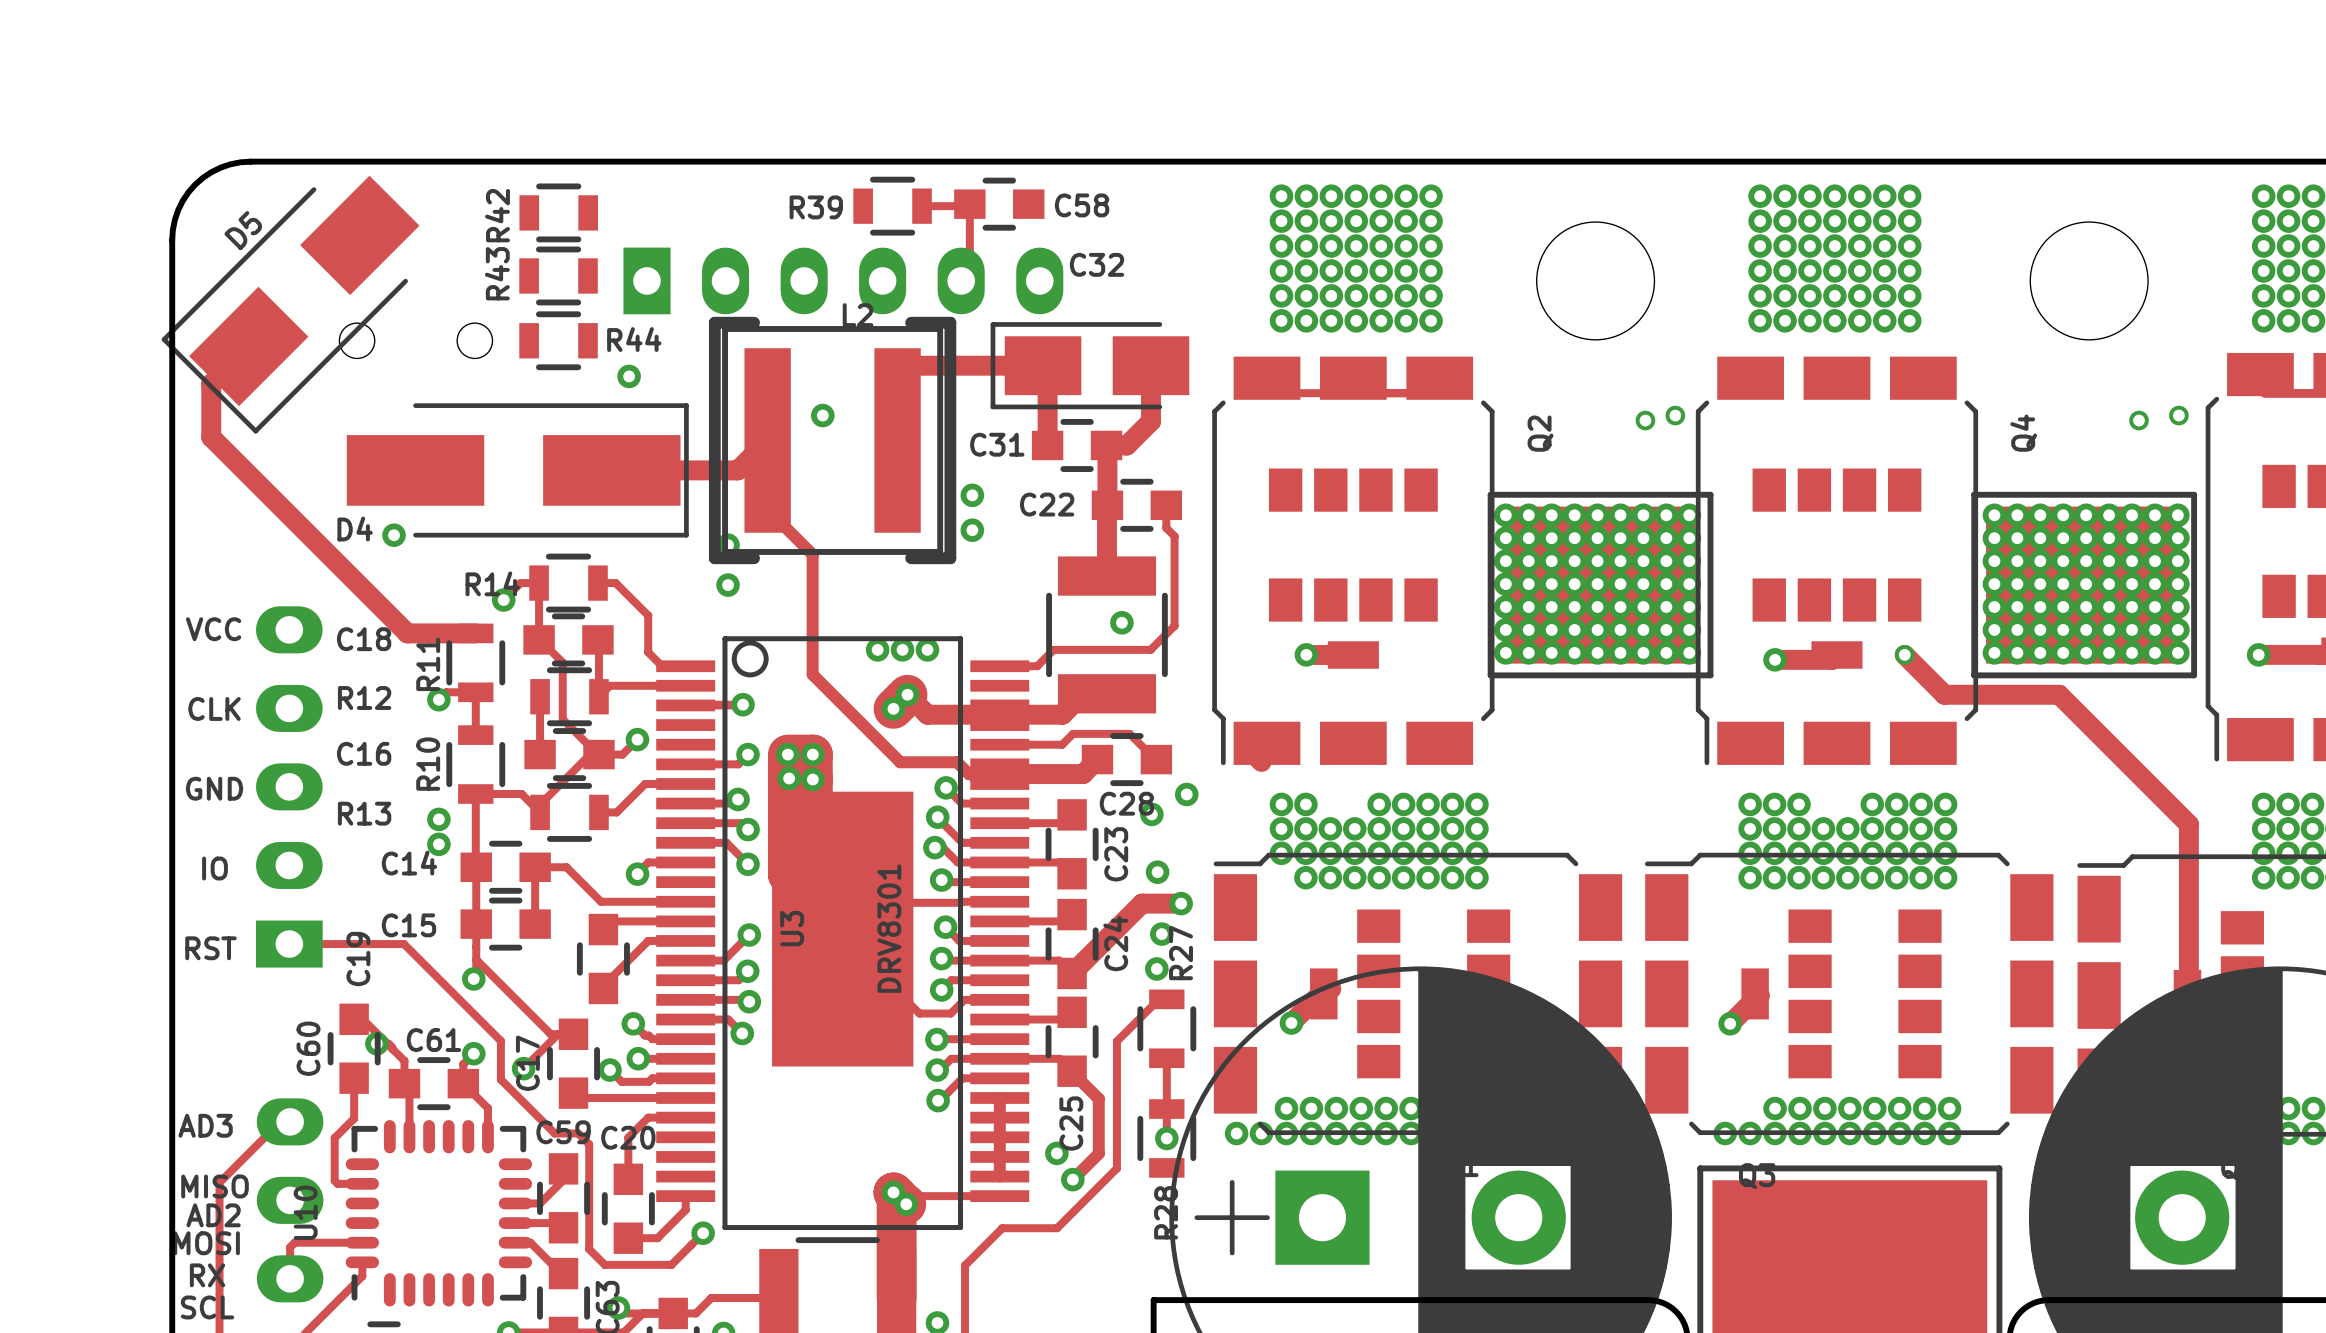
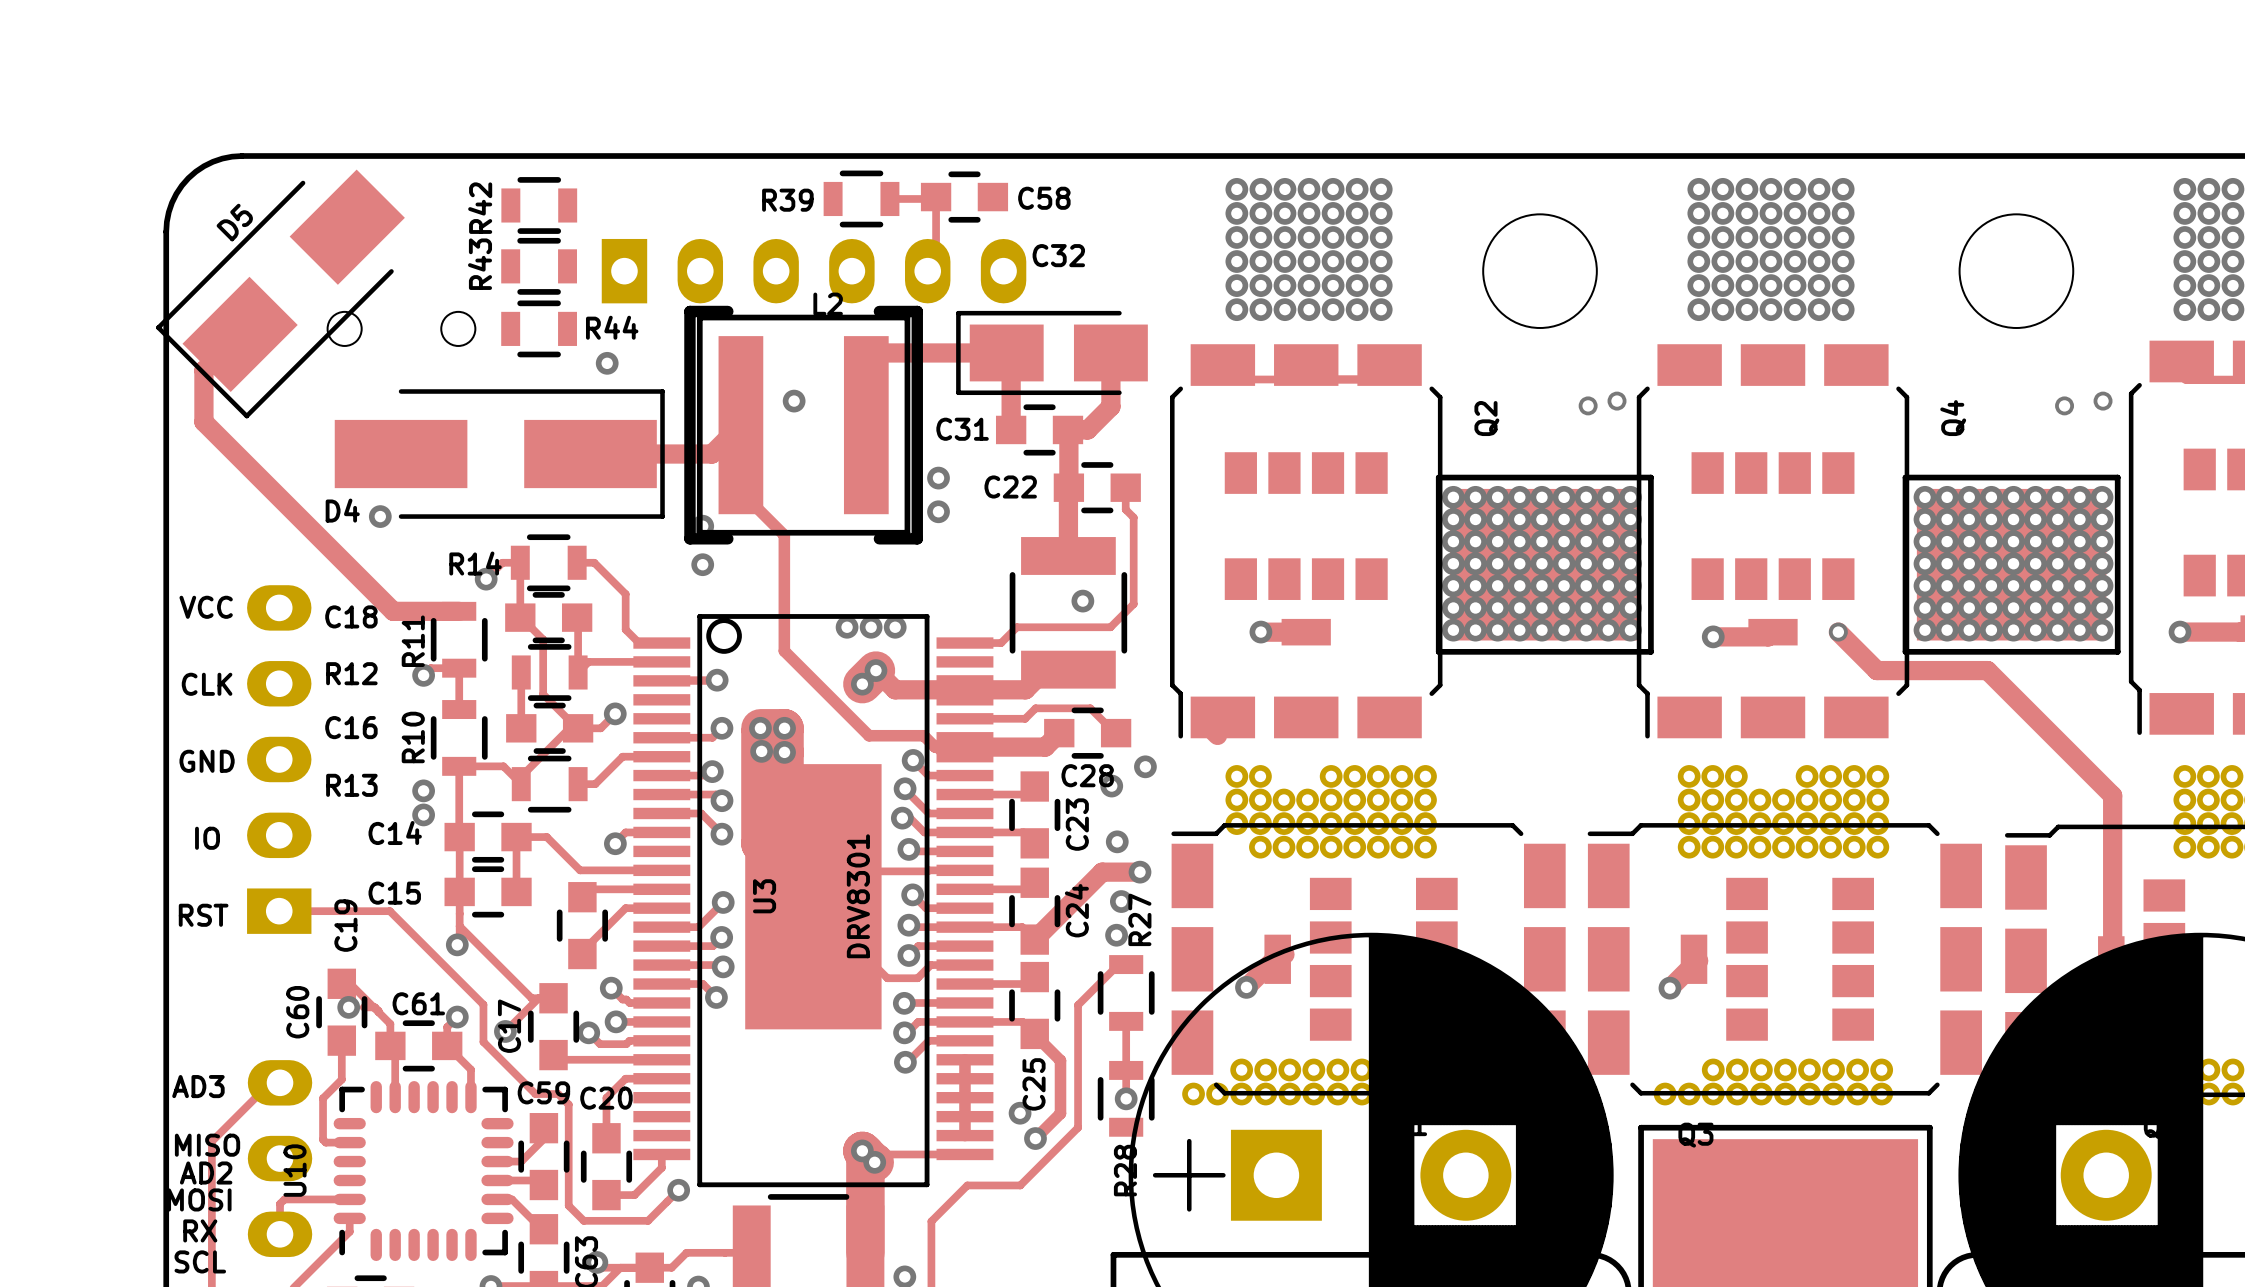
via position: (376, 1043) -> (348, 1007)

